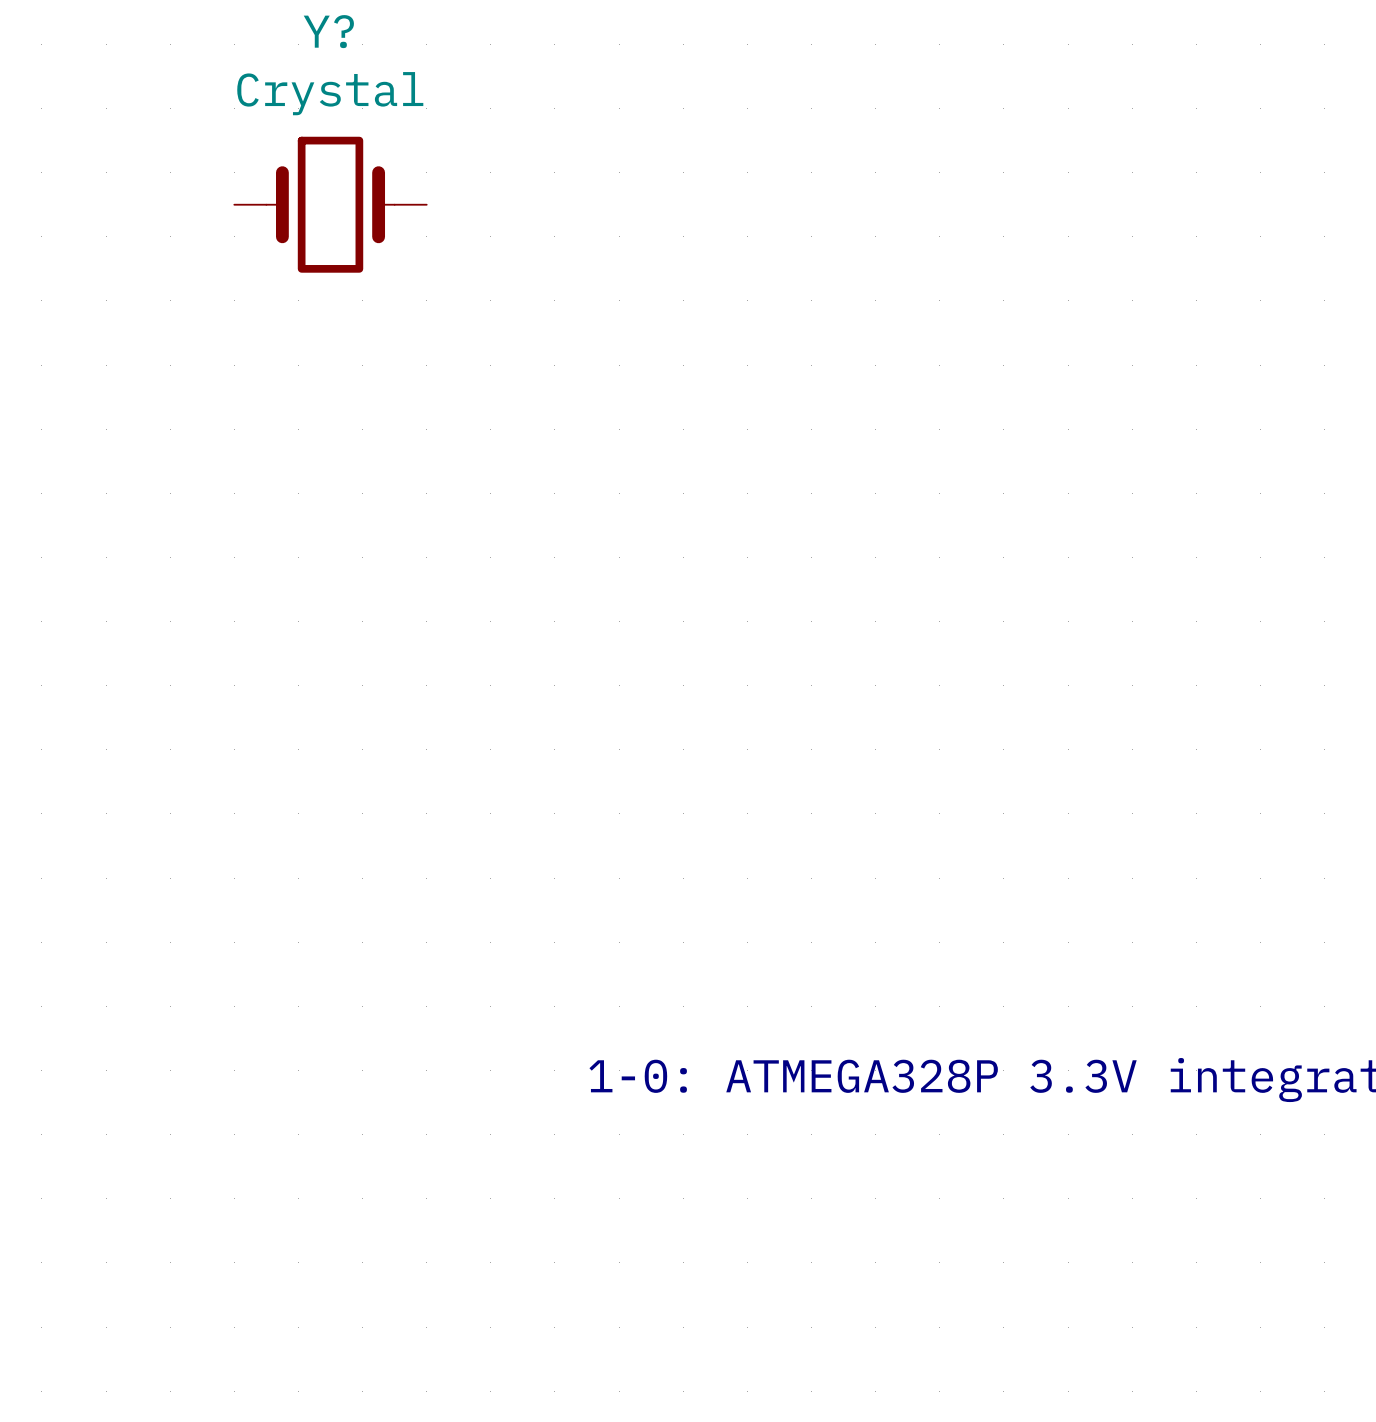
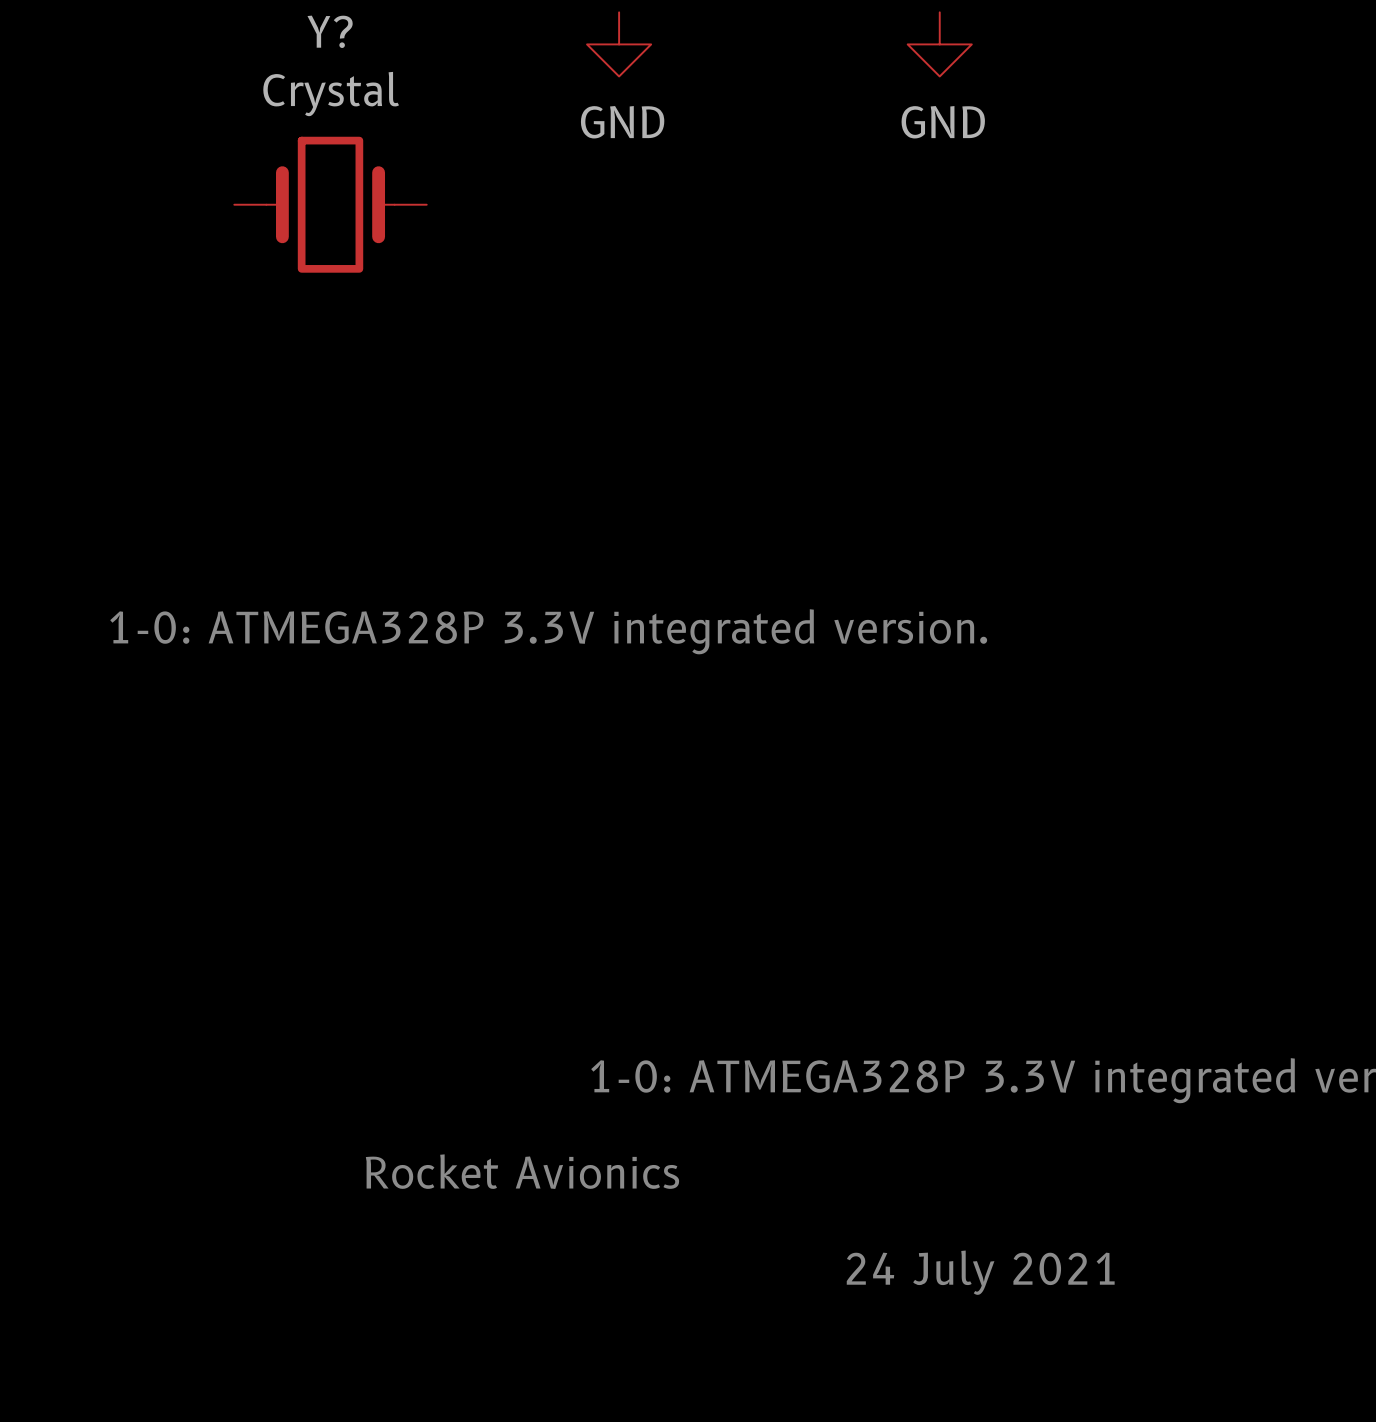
power symbol: none -> GND (619, 44)
power symbol: none -> GND (939, 44)
text: none -> 1-0: ATMEGA328P 3.3V integrated version. (548, 631)
text: none -> Rocket Avionics (522, 1171)
text: none -> 24 July 2021 (980, 1272)

